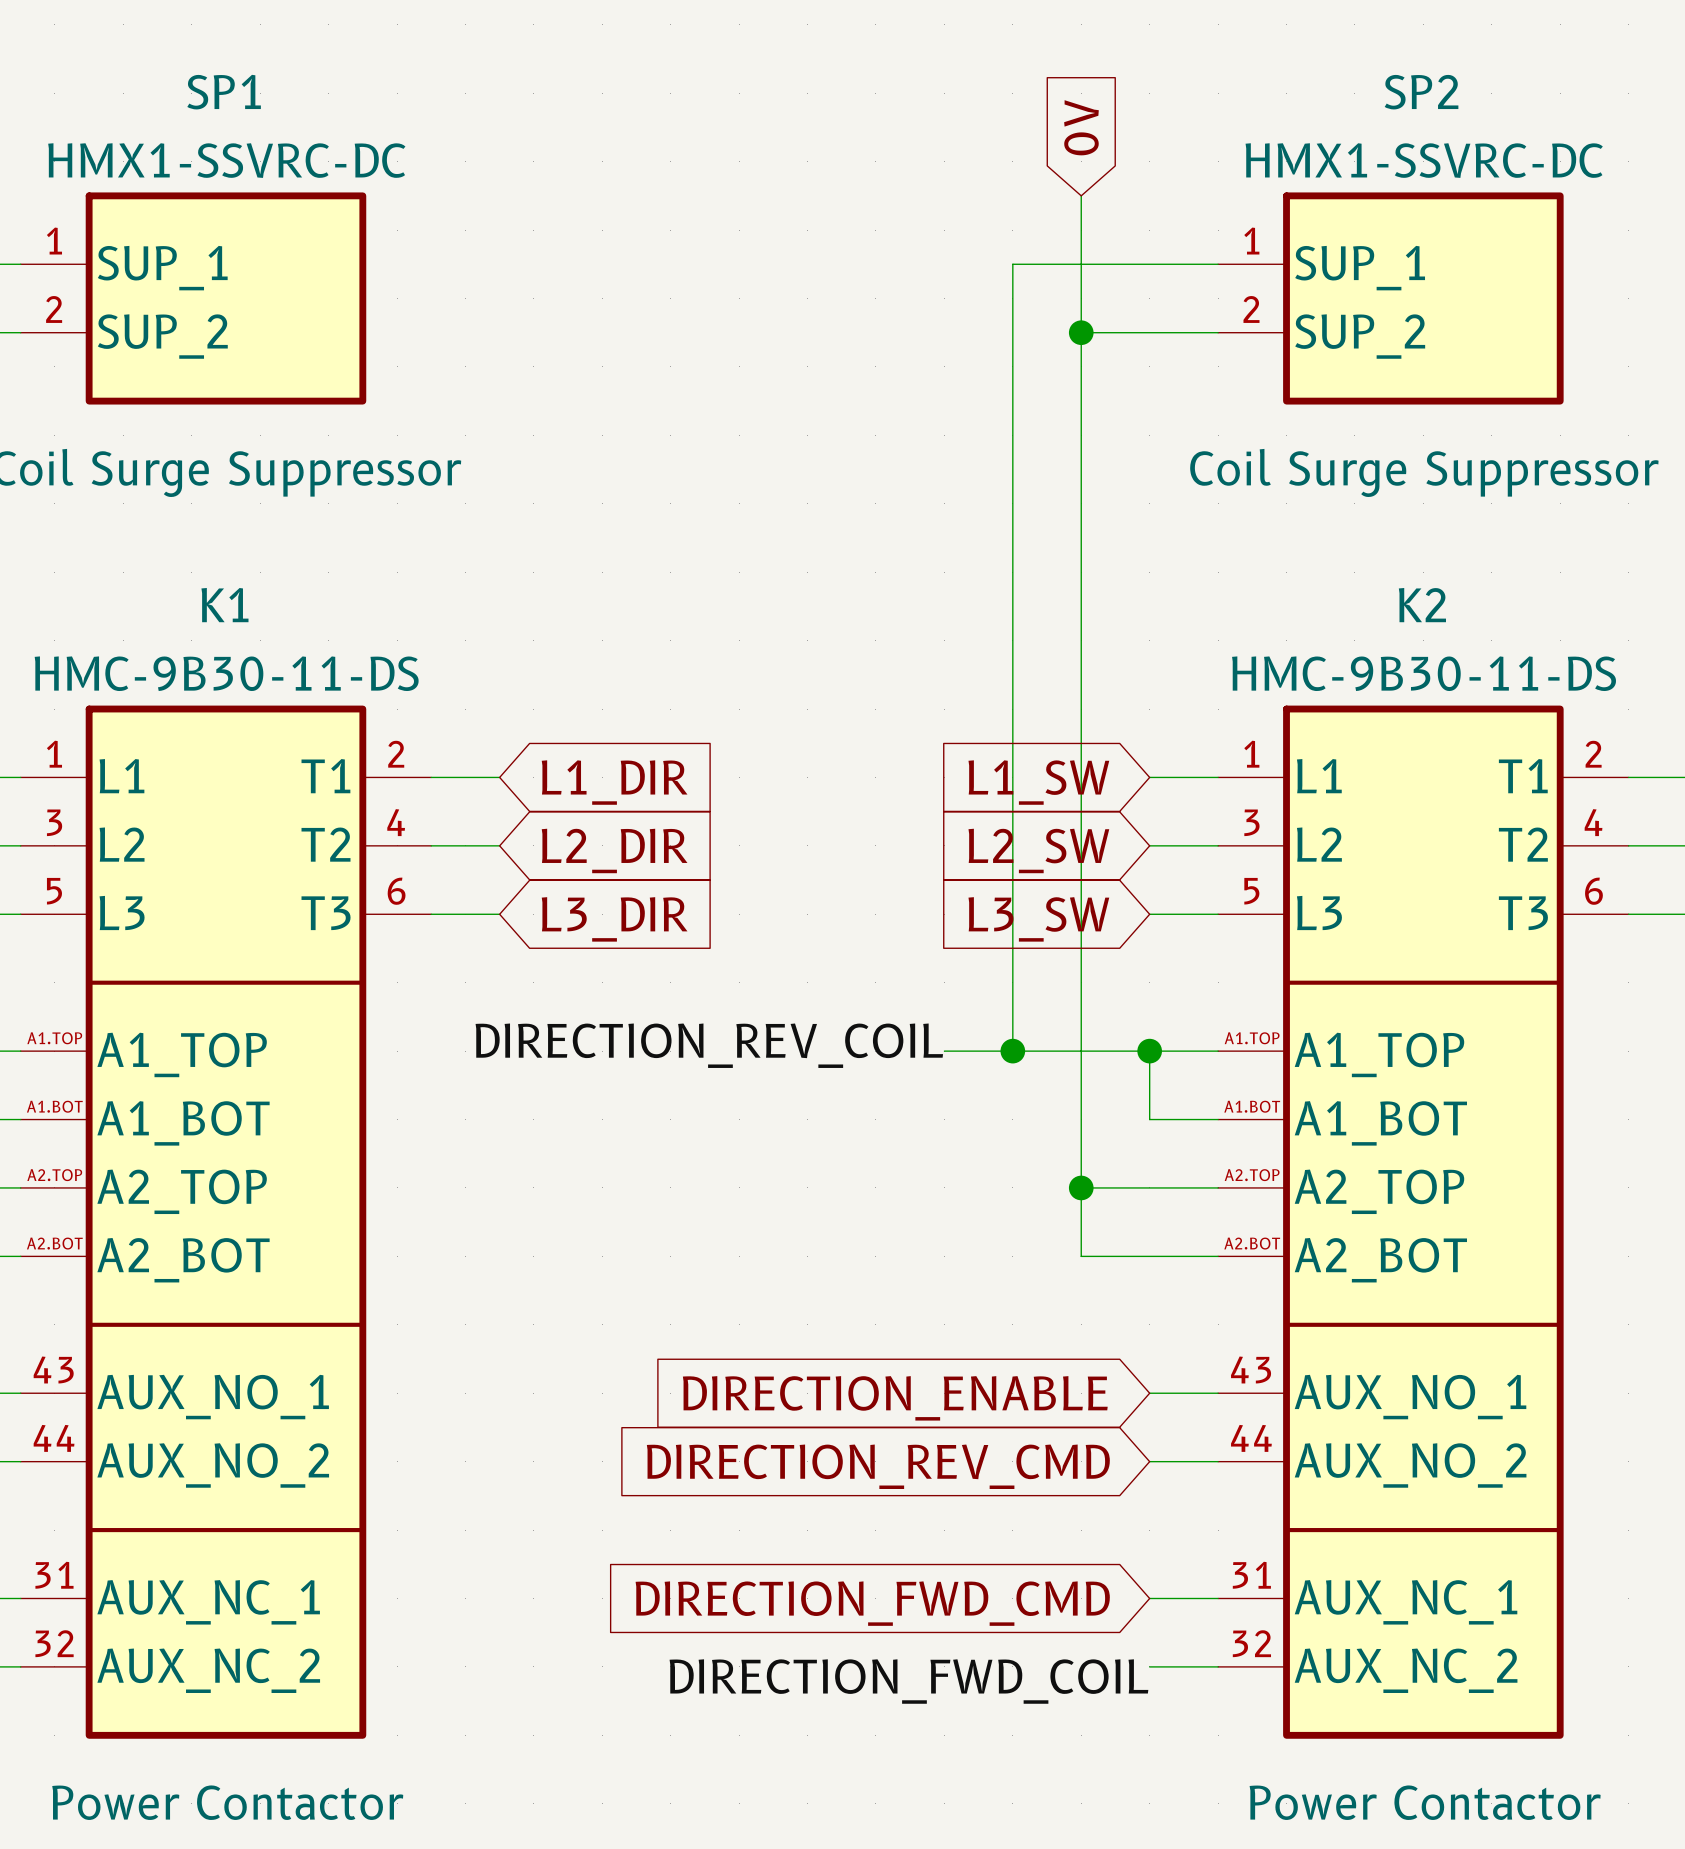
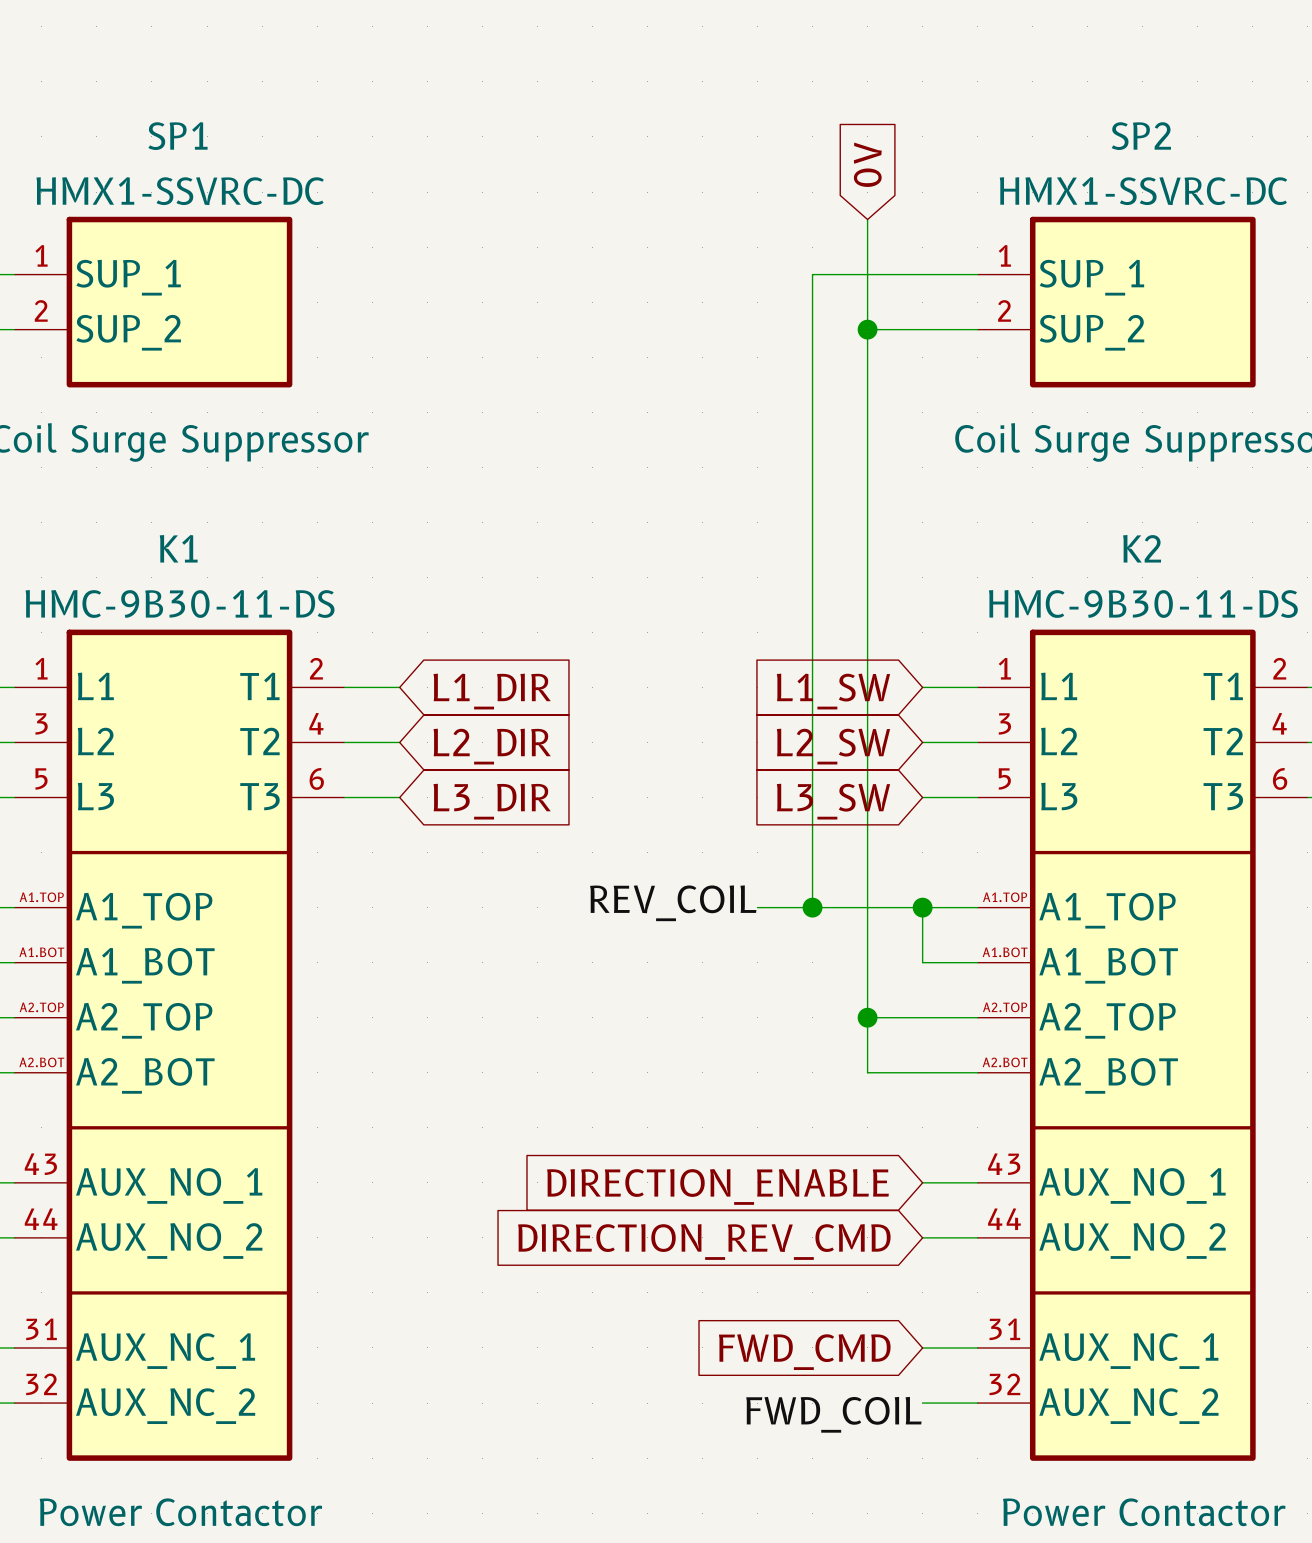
label: DIRECTION_REV_COIL (709, 1045) -> REV_COIL (673, 903)
global label: DIRECTION_FWD_CMD (872, 1603) -> FWD_CMD (804, 1352)
label: DIRECTION_FWD_COIL (908, 1681) -> FWD_COIL (833, 1414)

